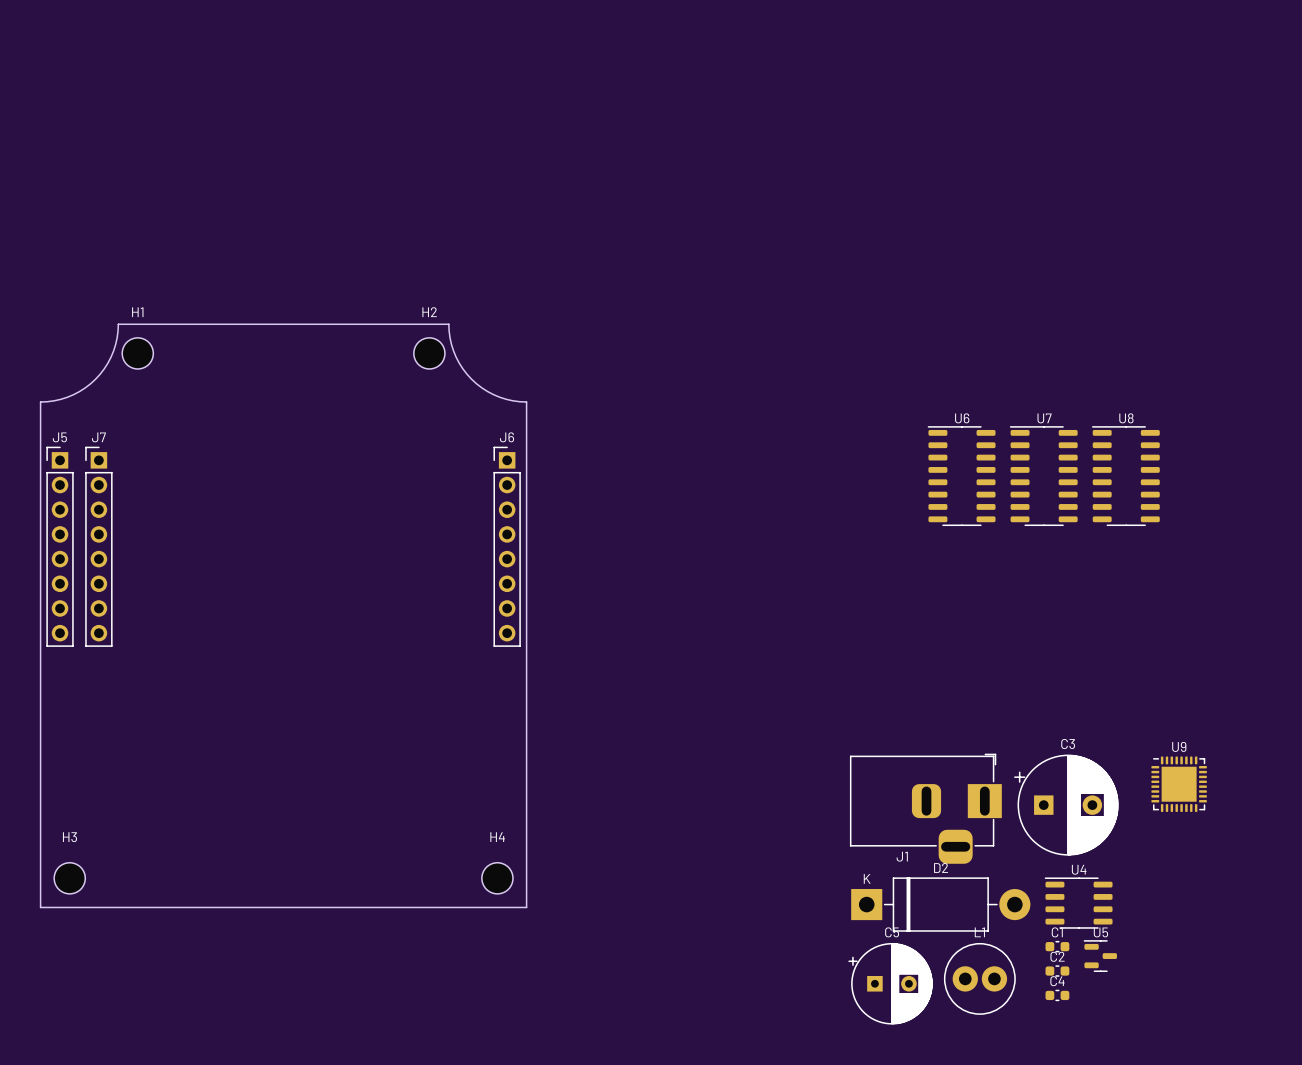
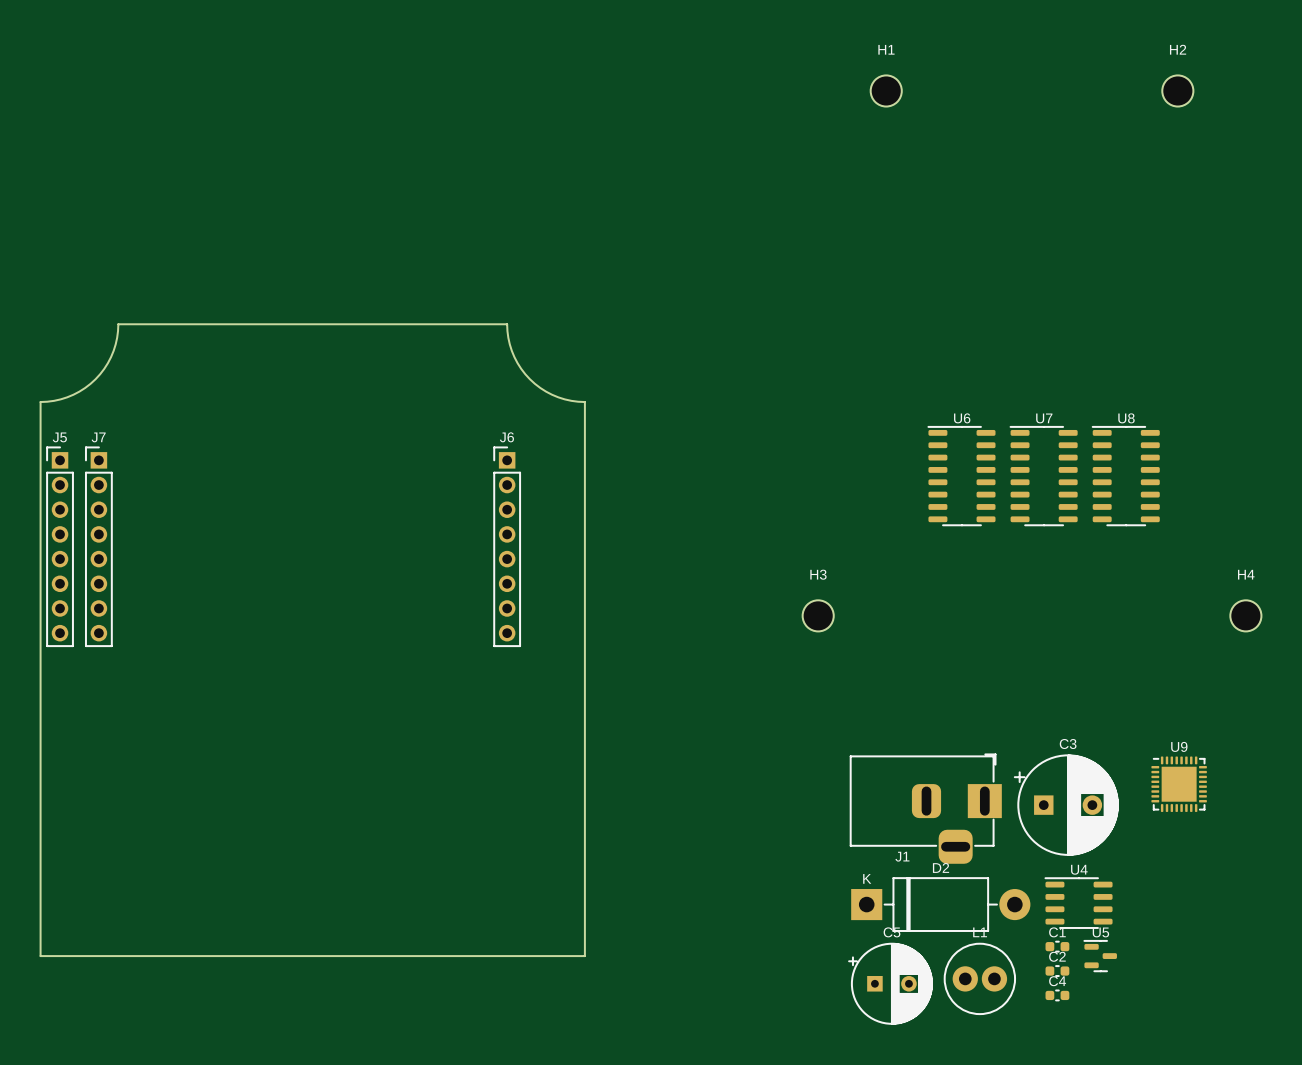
board edge: (448, 324) (451, 344) (456, 357) (471, 379) (493, 394) (513, 400) (526, 402) (526, 907) (40, 907) -> (448, 324) (507, 324) (509, 344) (514, 357) (529, 379) (546, 391) (558, 397) (584, 402) (584, 956) (40, 956) (40, 907)
H1 position: (137, 353) -> (886, 90)
H2 position: (429, 353) -> (1177, 90)
H3 position: (69, 878) -> (818, 615)
H4 position: (497, 878) -> (1245, 615)

